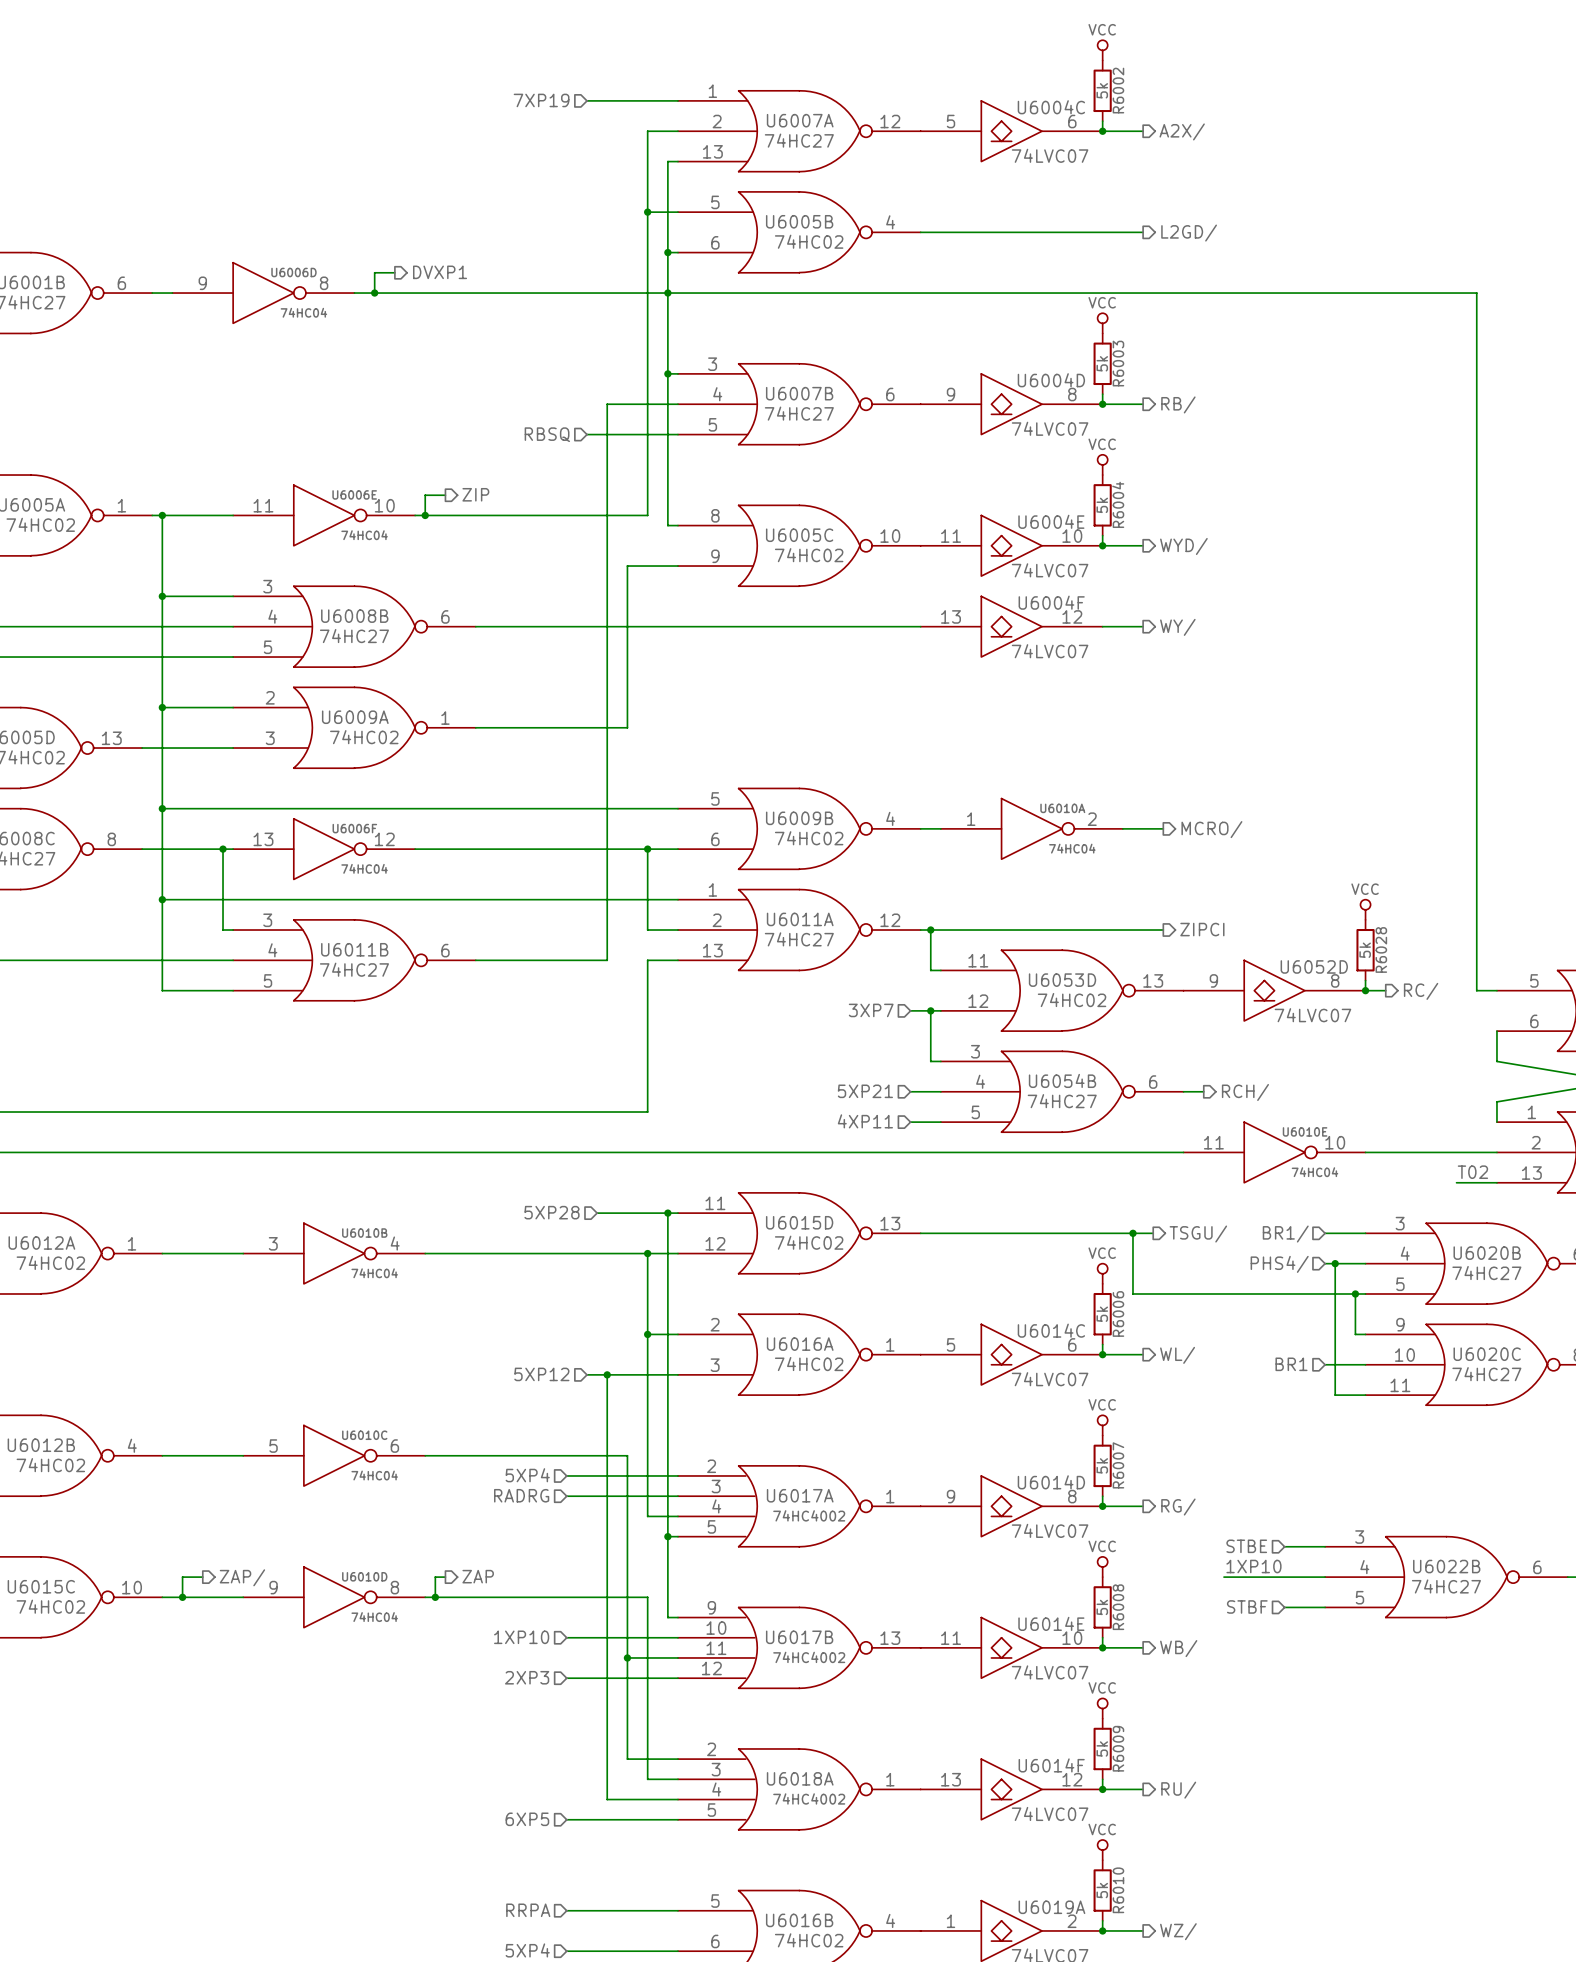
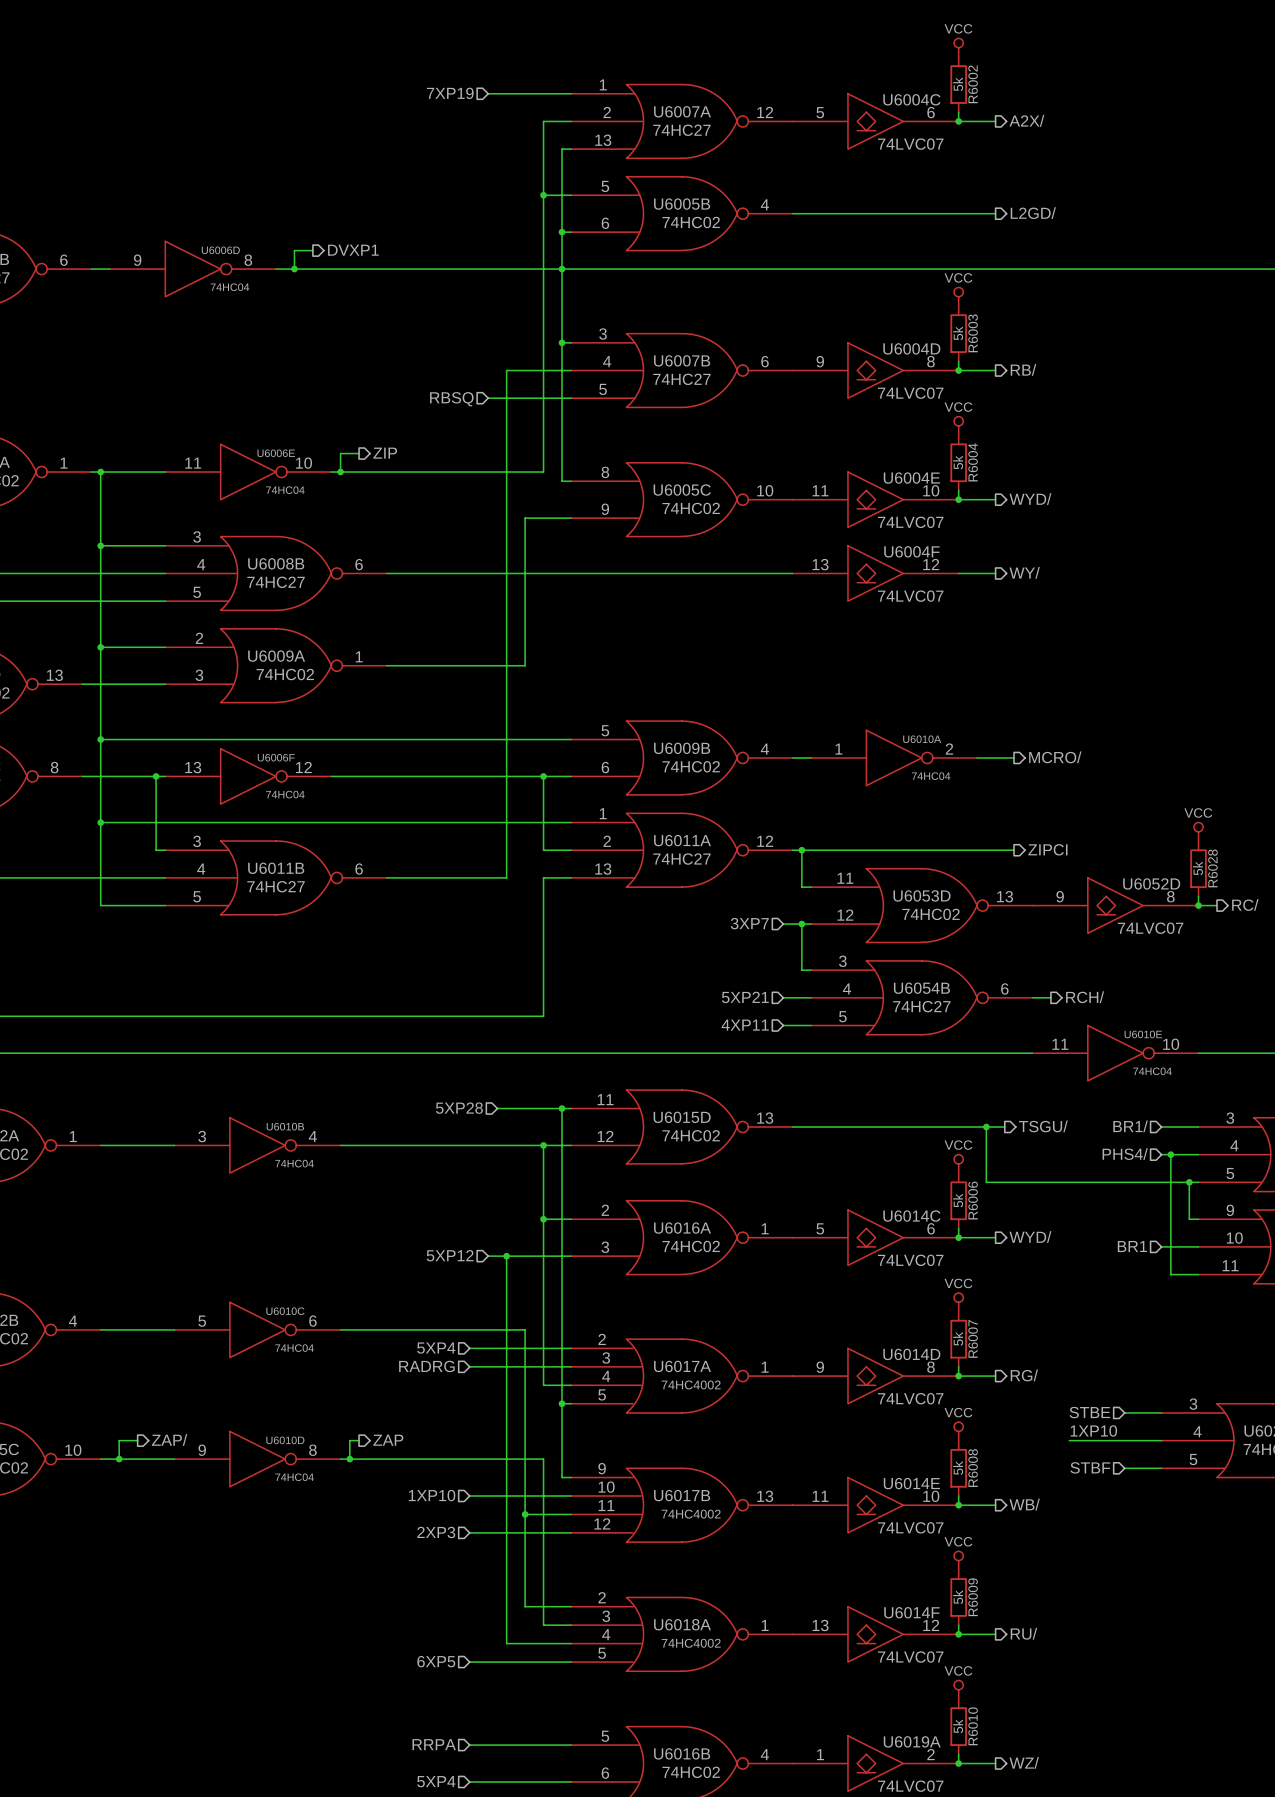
hierarchical label: WL/ (1177, 1355) -> WYD/ (1030, 1237)

